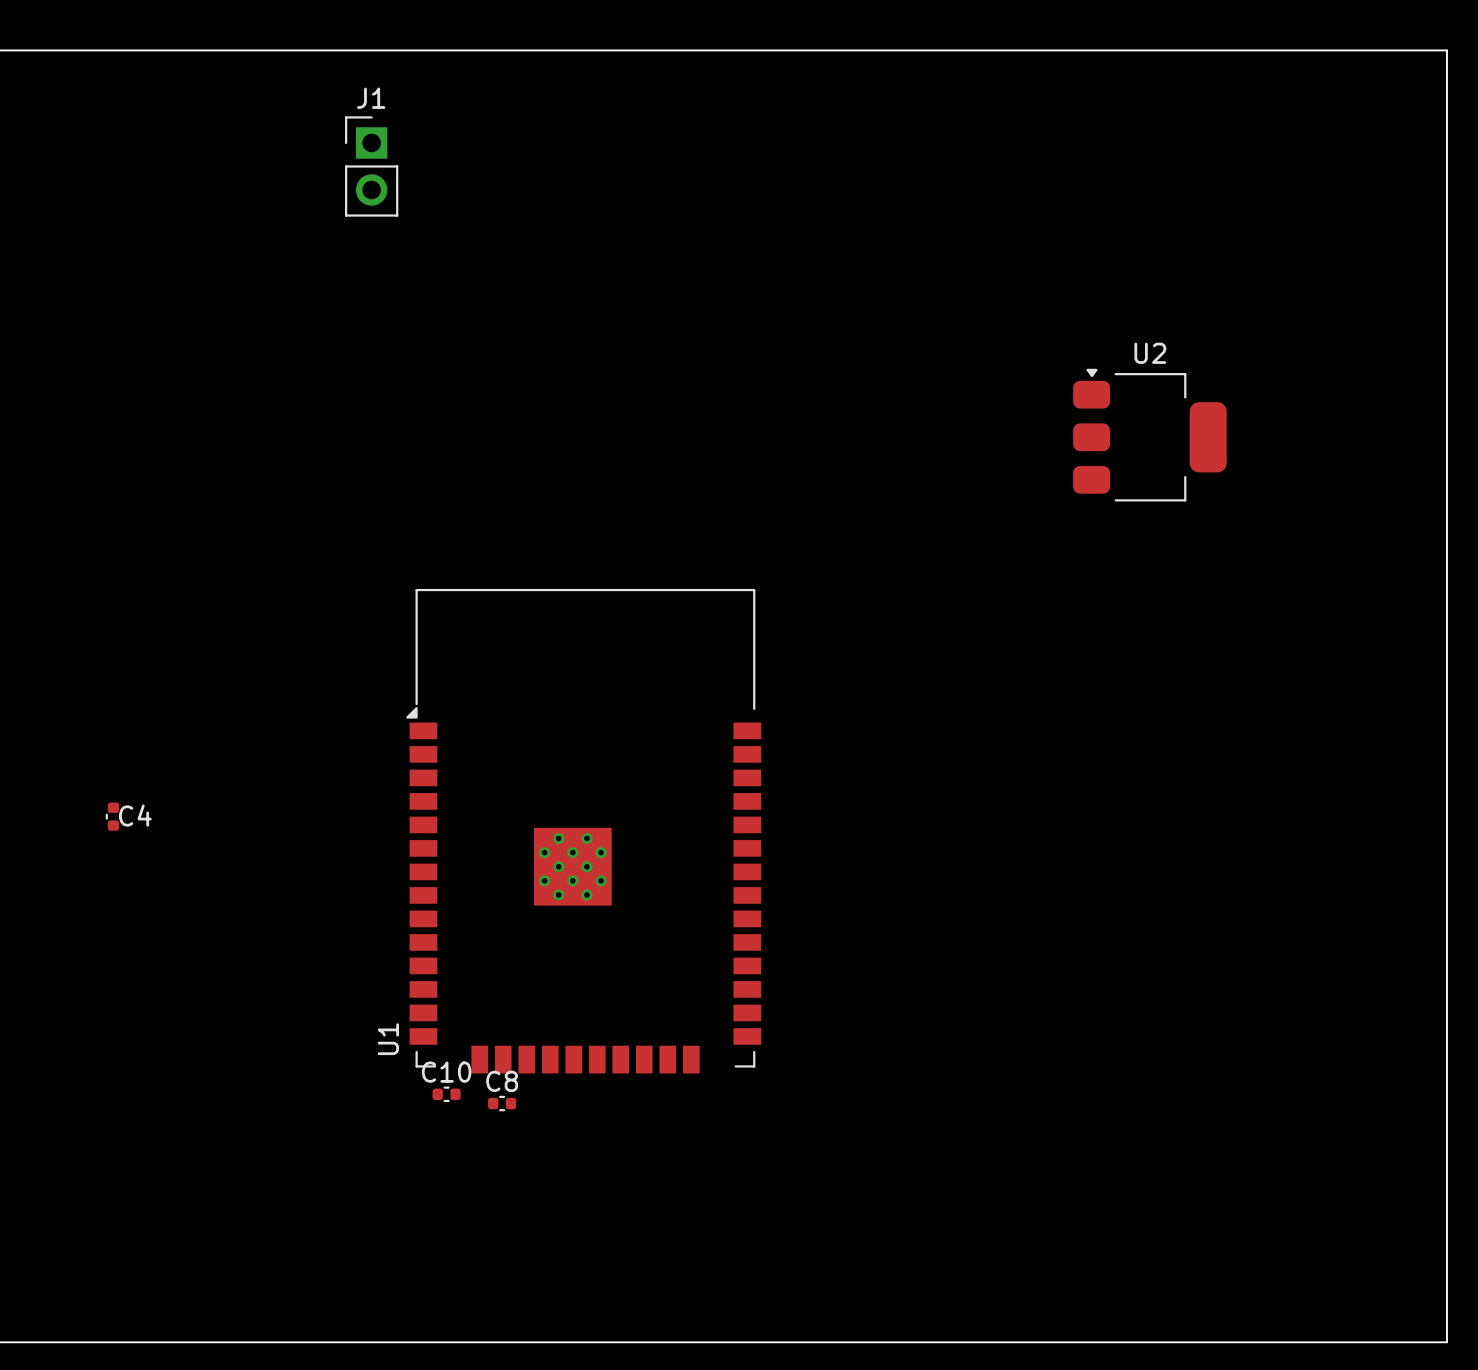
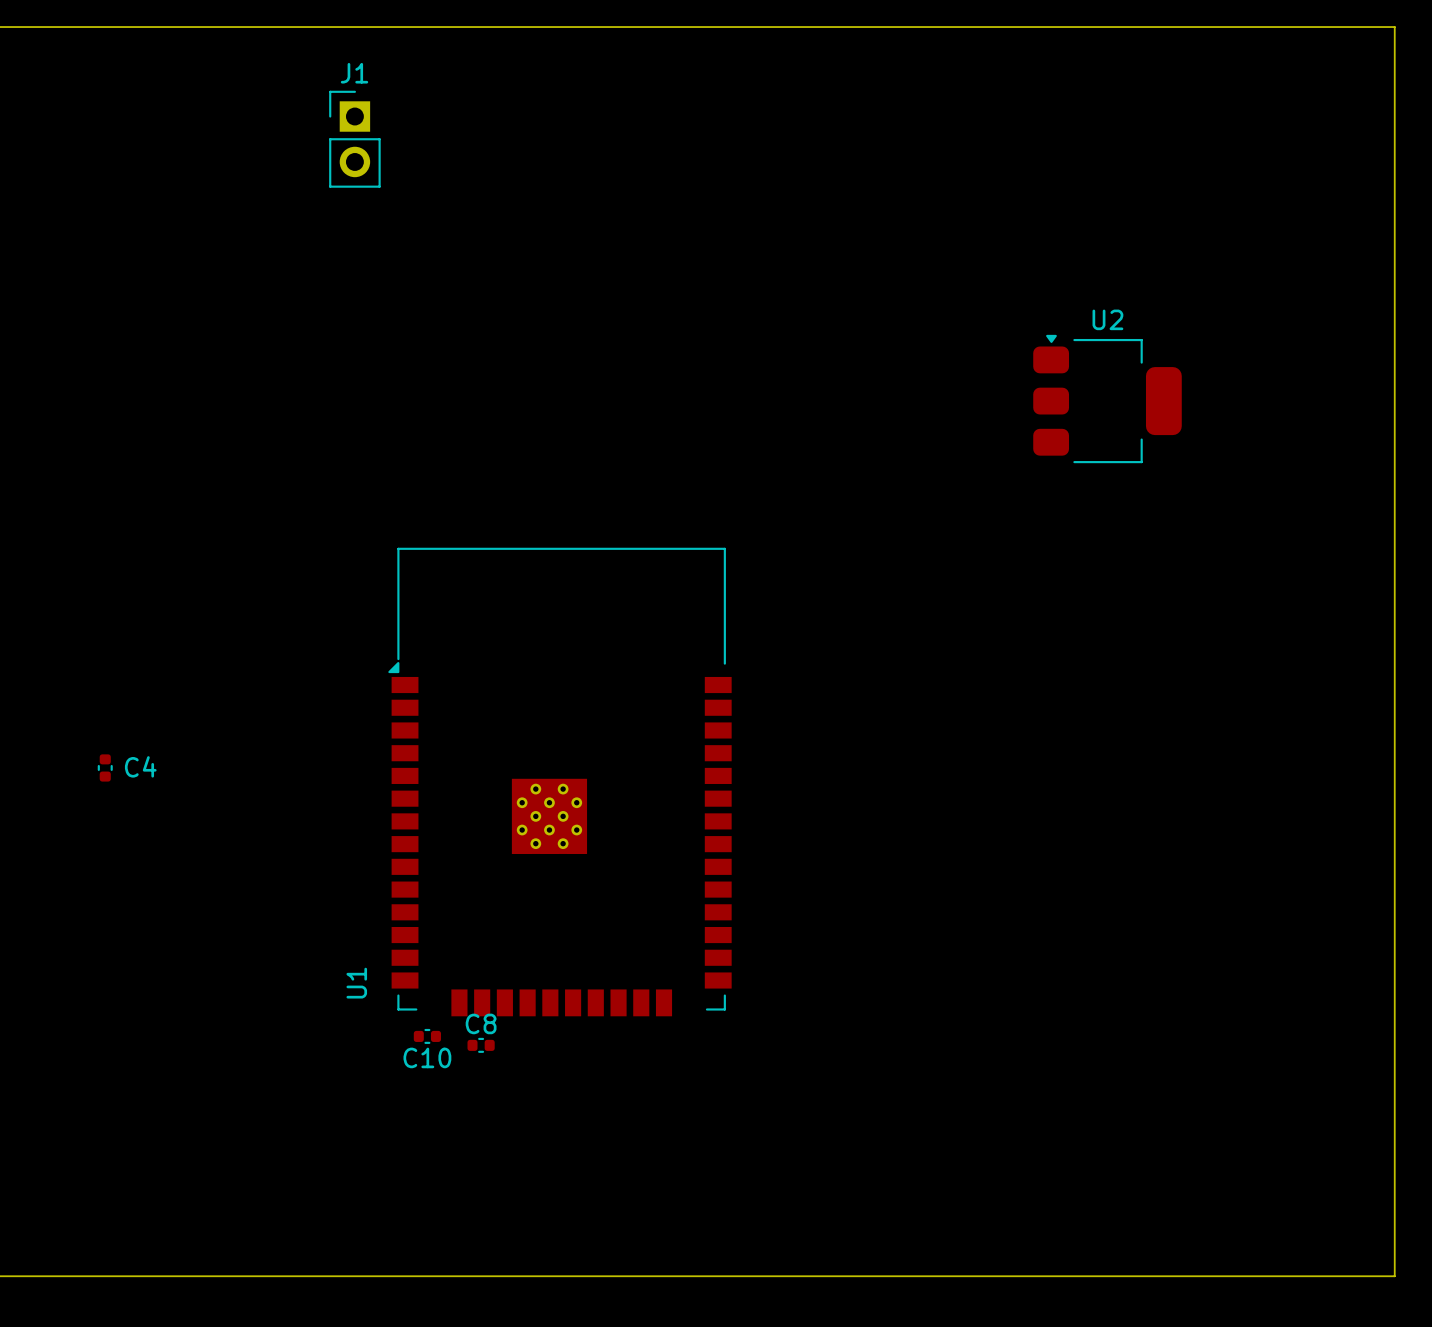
C4 name position: C4 (135, 815) -> C4 (140, 766)
U1 name position: U1 (388, 1039) -> U1 (356, 983)
C10 name position: C10 (446, 1072) -> C10 (427, 1057)

